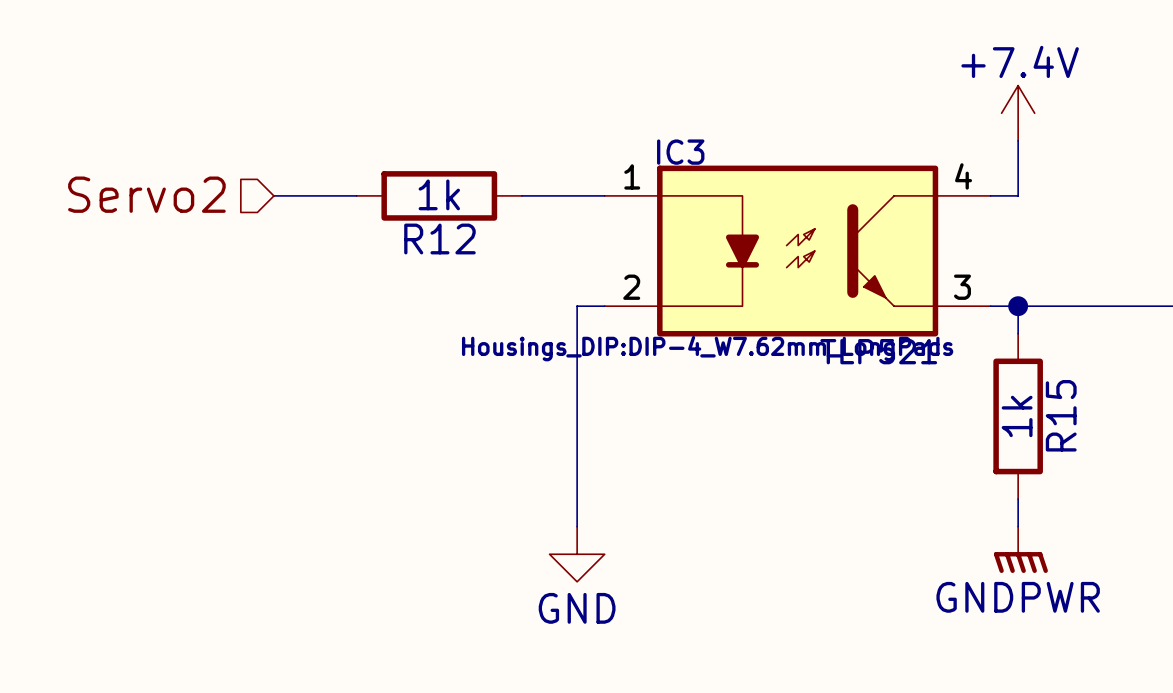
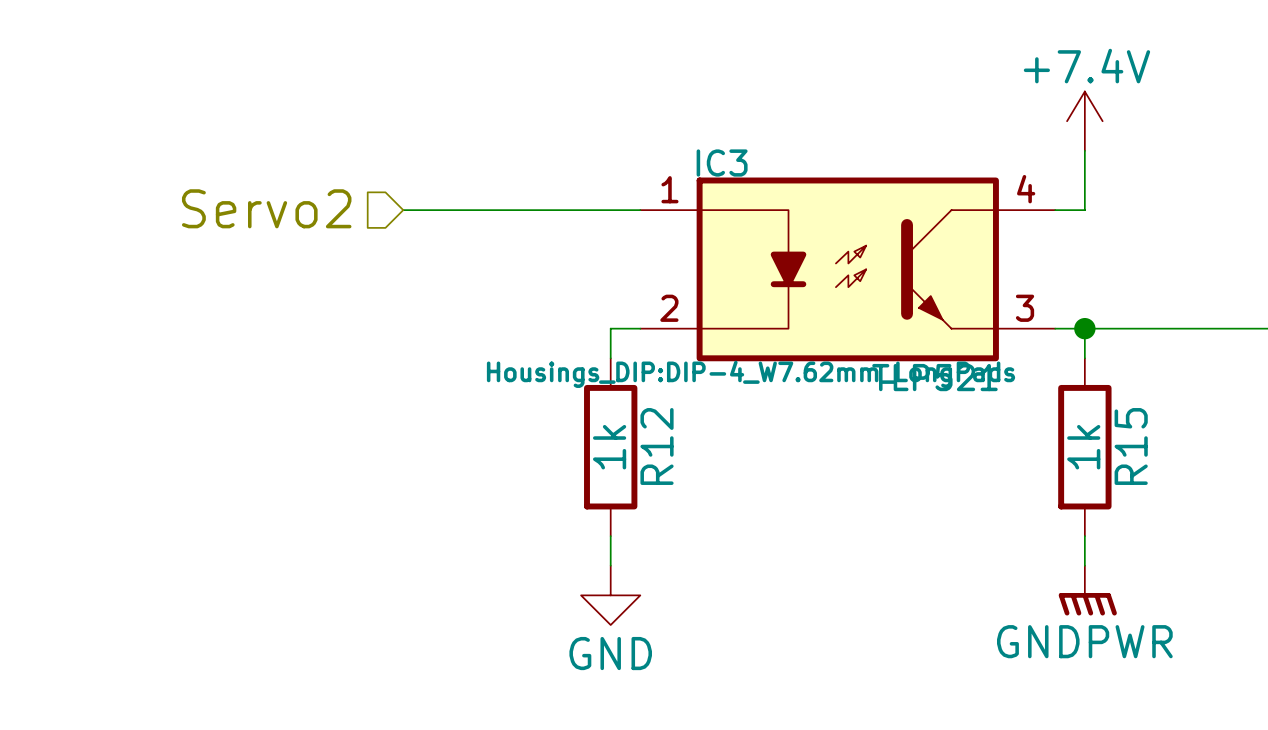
hierarchical label position: Servo2 (146, 194) -> Servo2 (266, 208)
wire: (273, 195) (356, 195) -> none
wire: none -> (403, 210) (551, 210)
R12 rotation: 0° (439, 195) -> 90° clockwise (610, 447)
R12 position: (439, 195) -> (610, 447)
R12 name position: R12 (439, 238) -> R12 (657, 446)
wire: (577, 333) (577, 499) -> none

